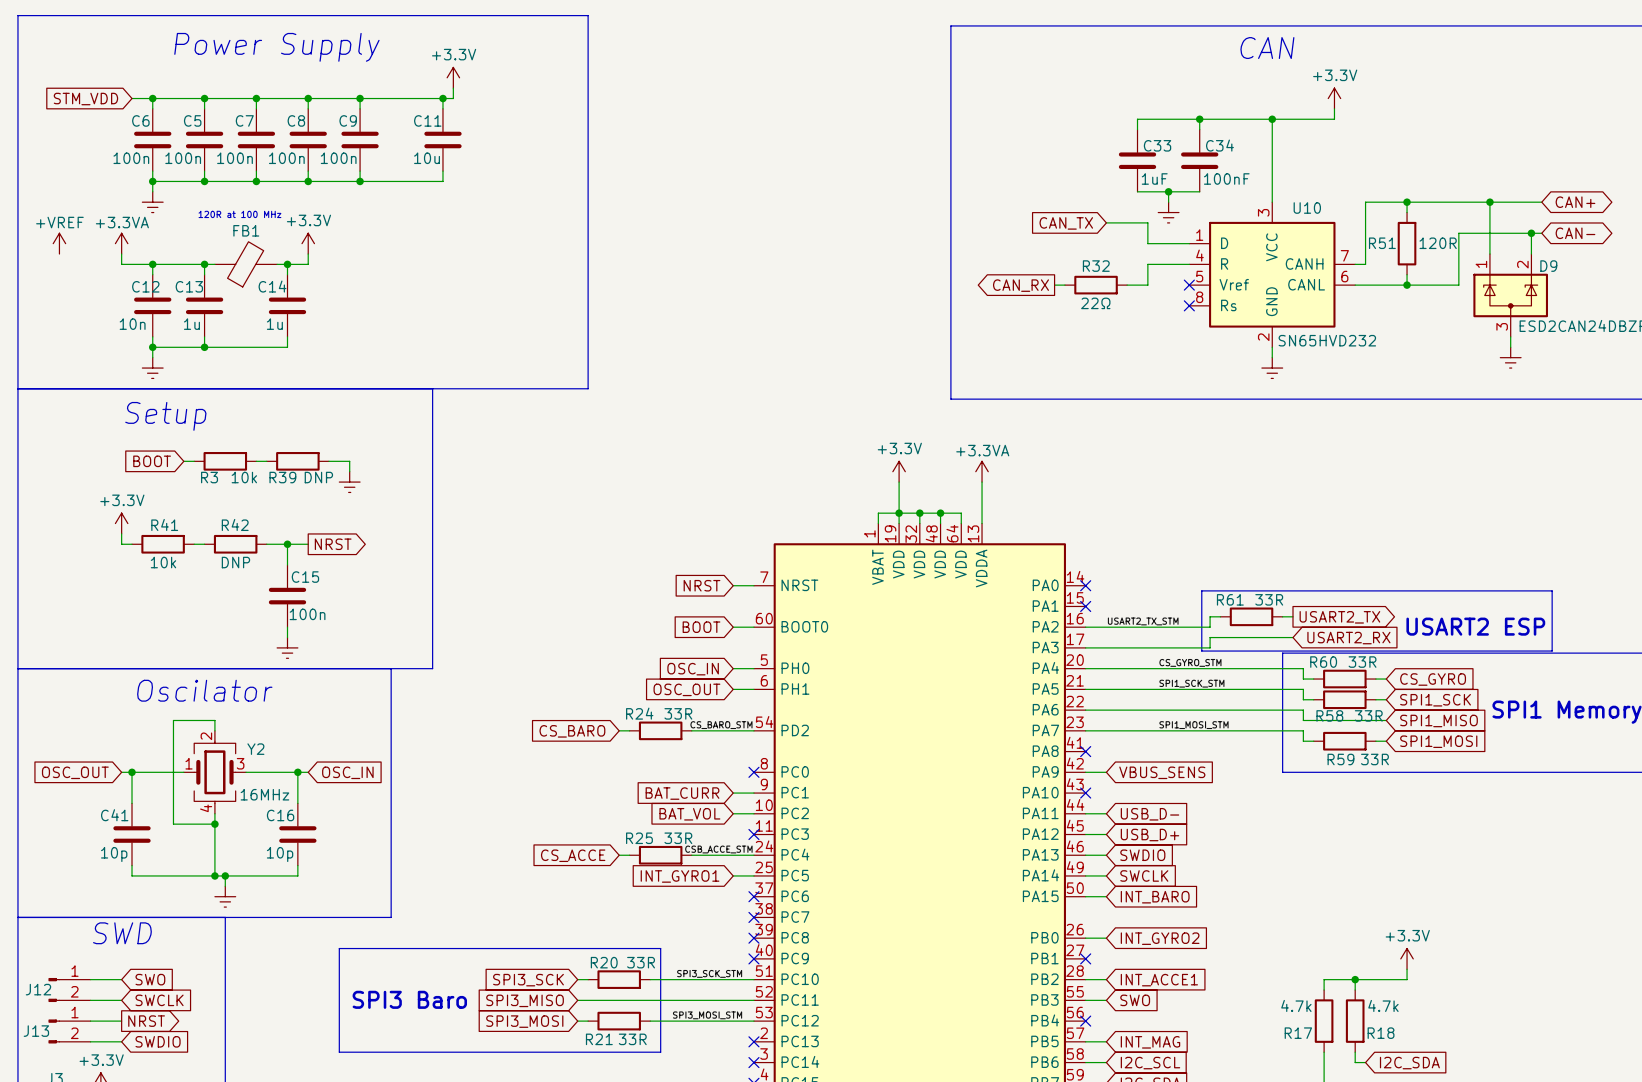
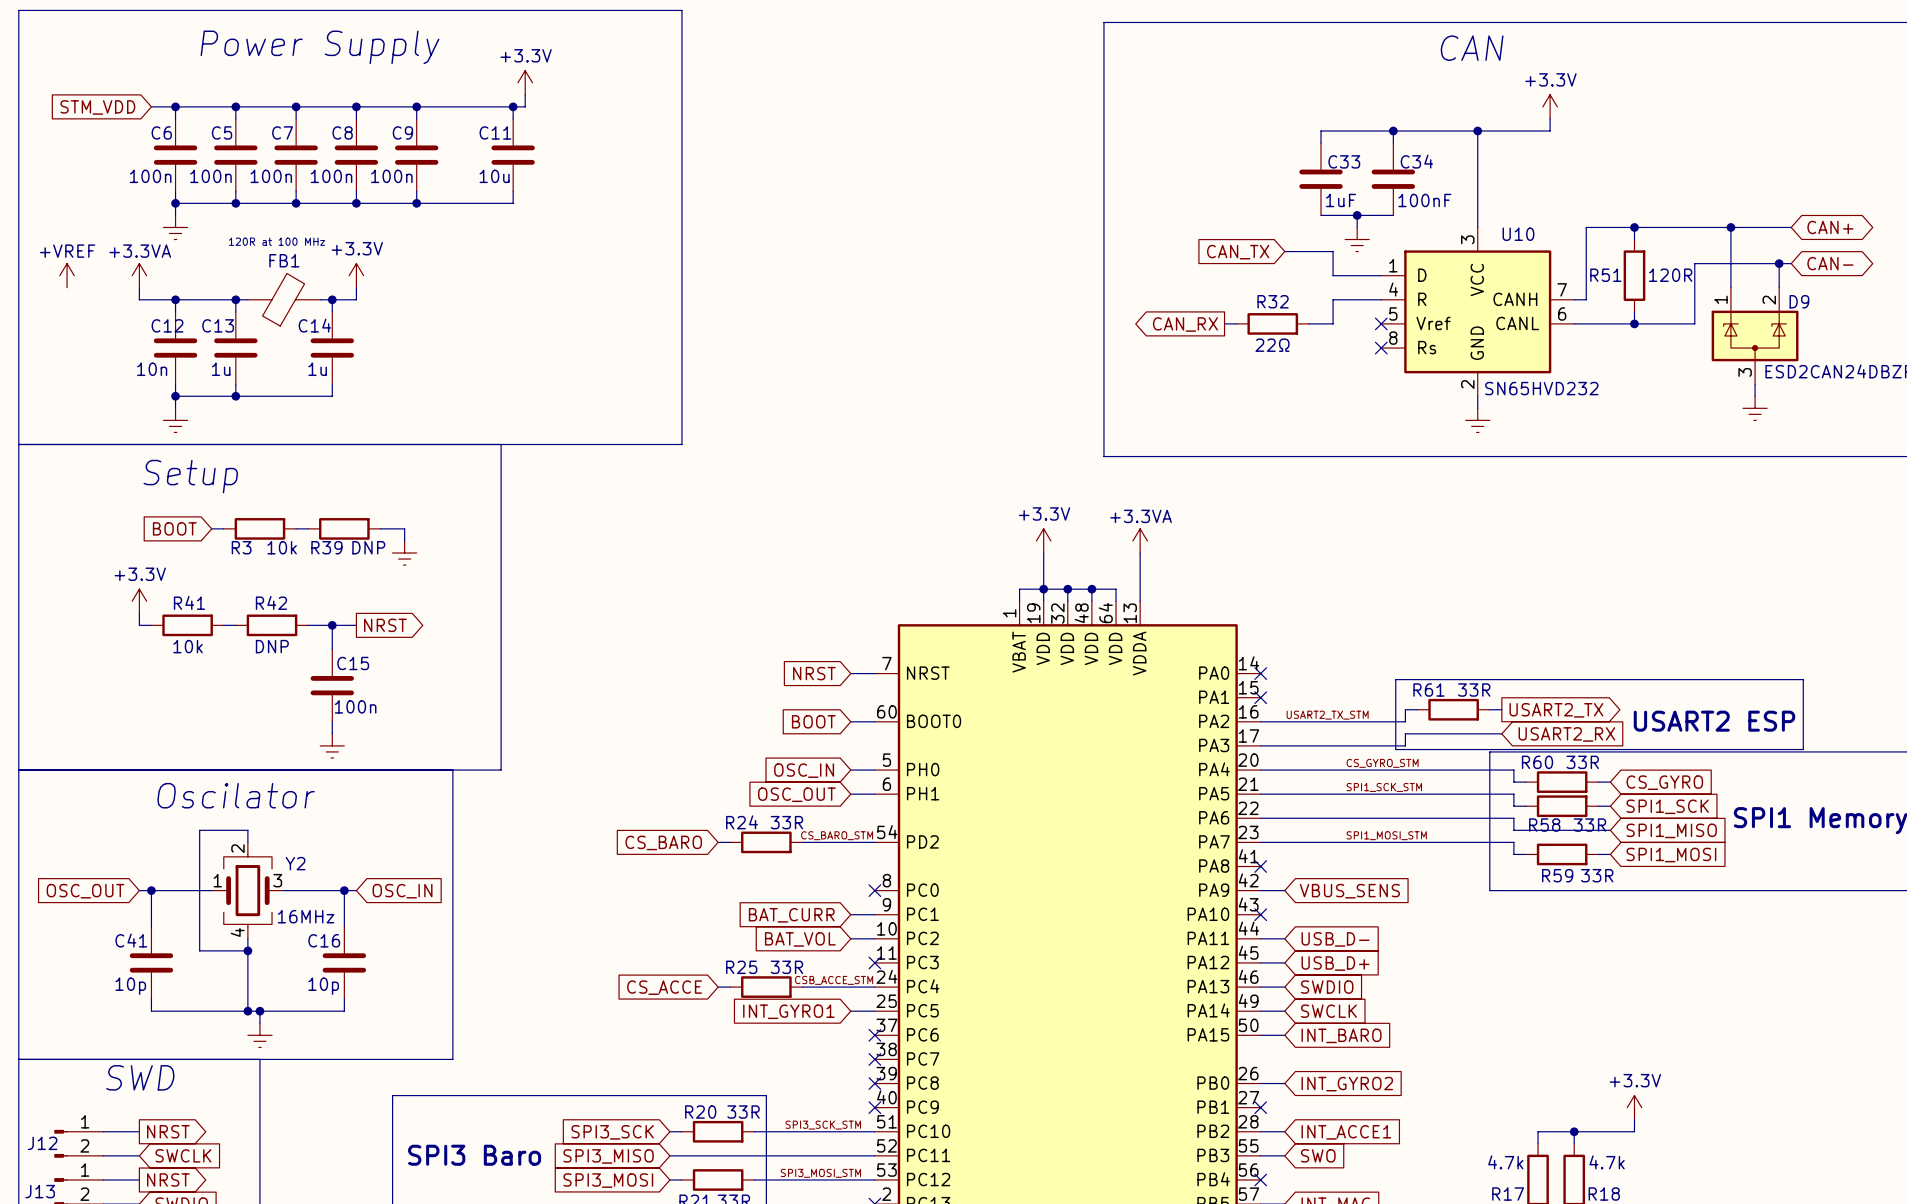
global label shape: input (150, 979) -> output (168, 1131)
global label: SWO (150, 979) -> NRST (168, 1131)

